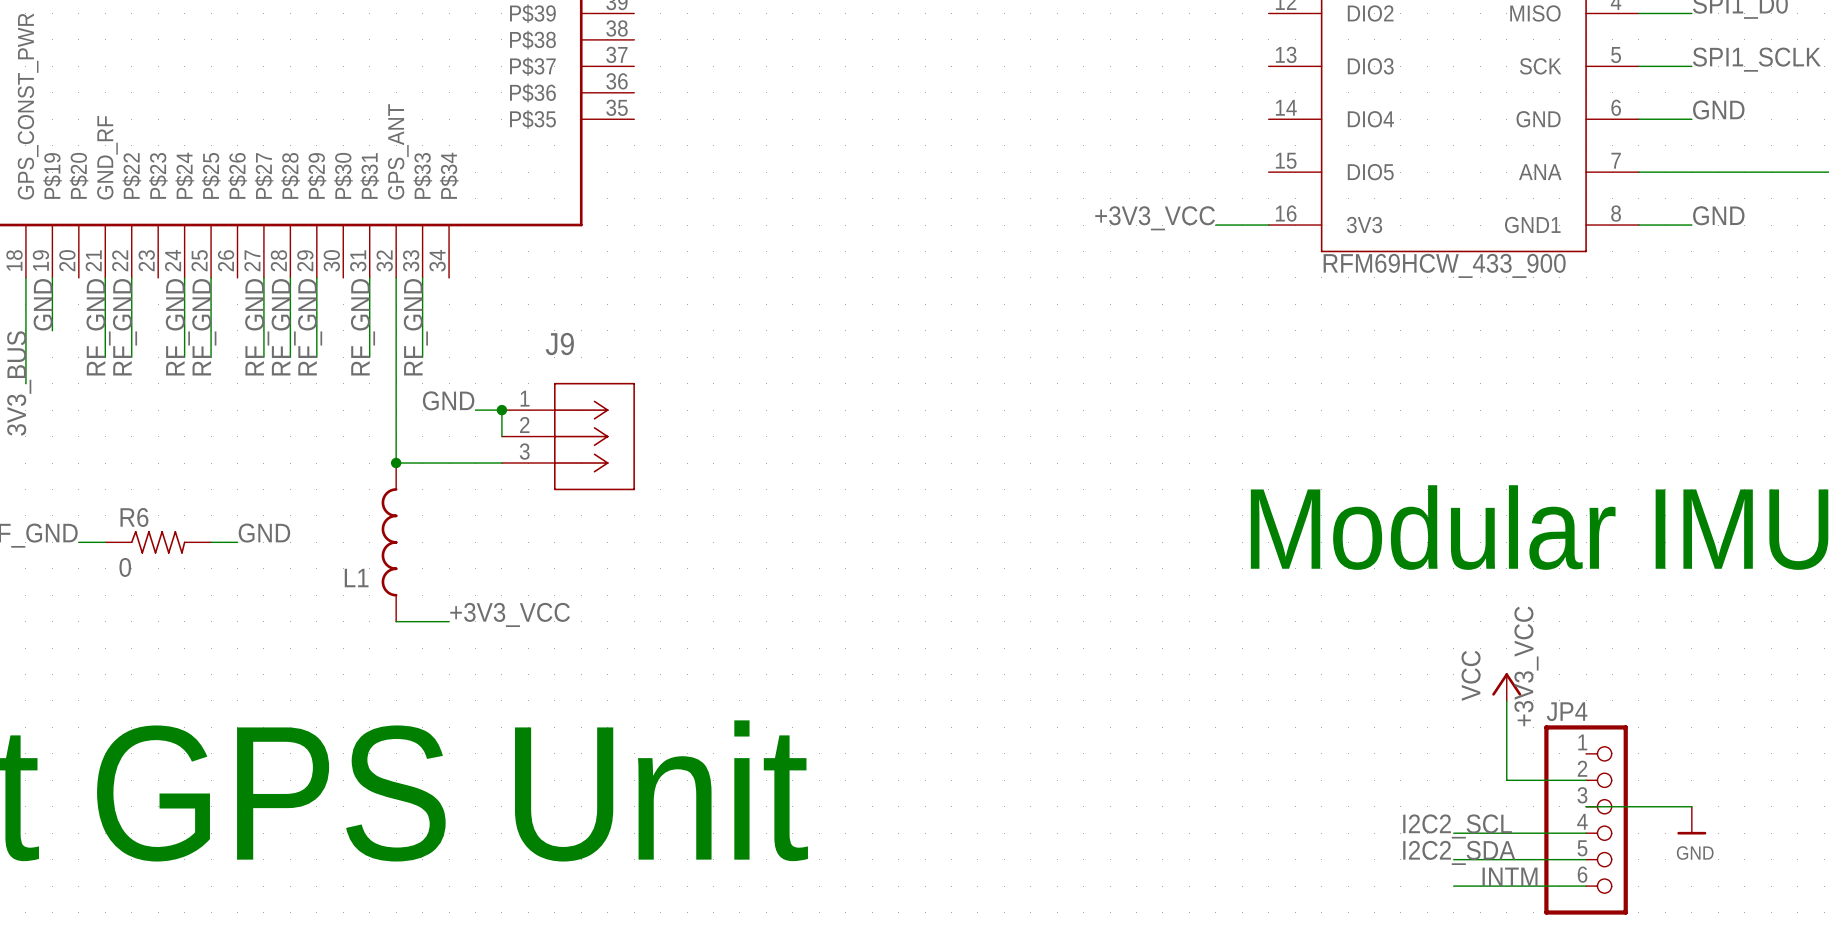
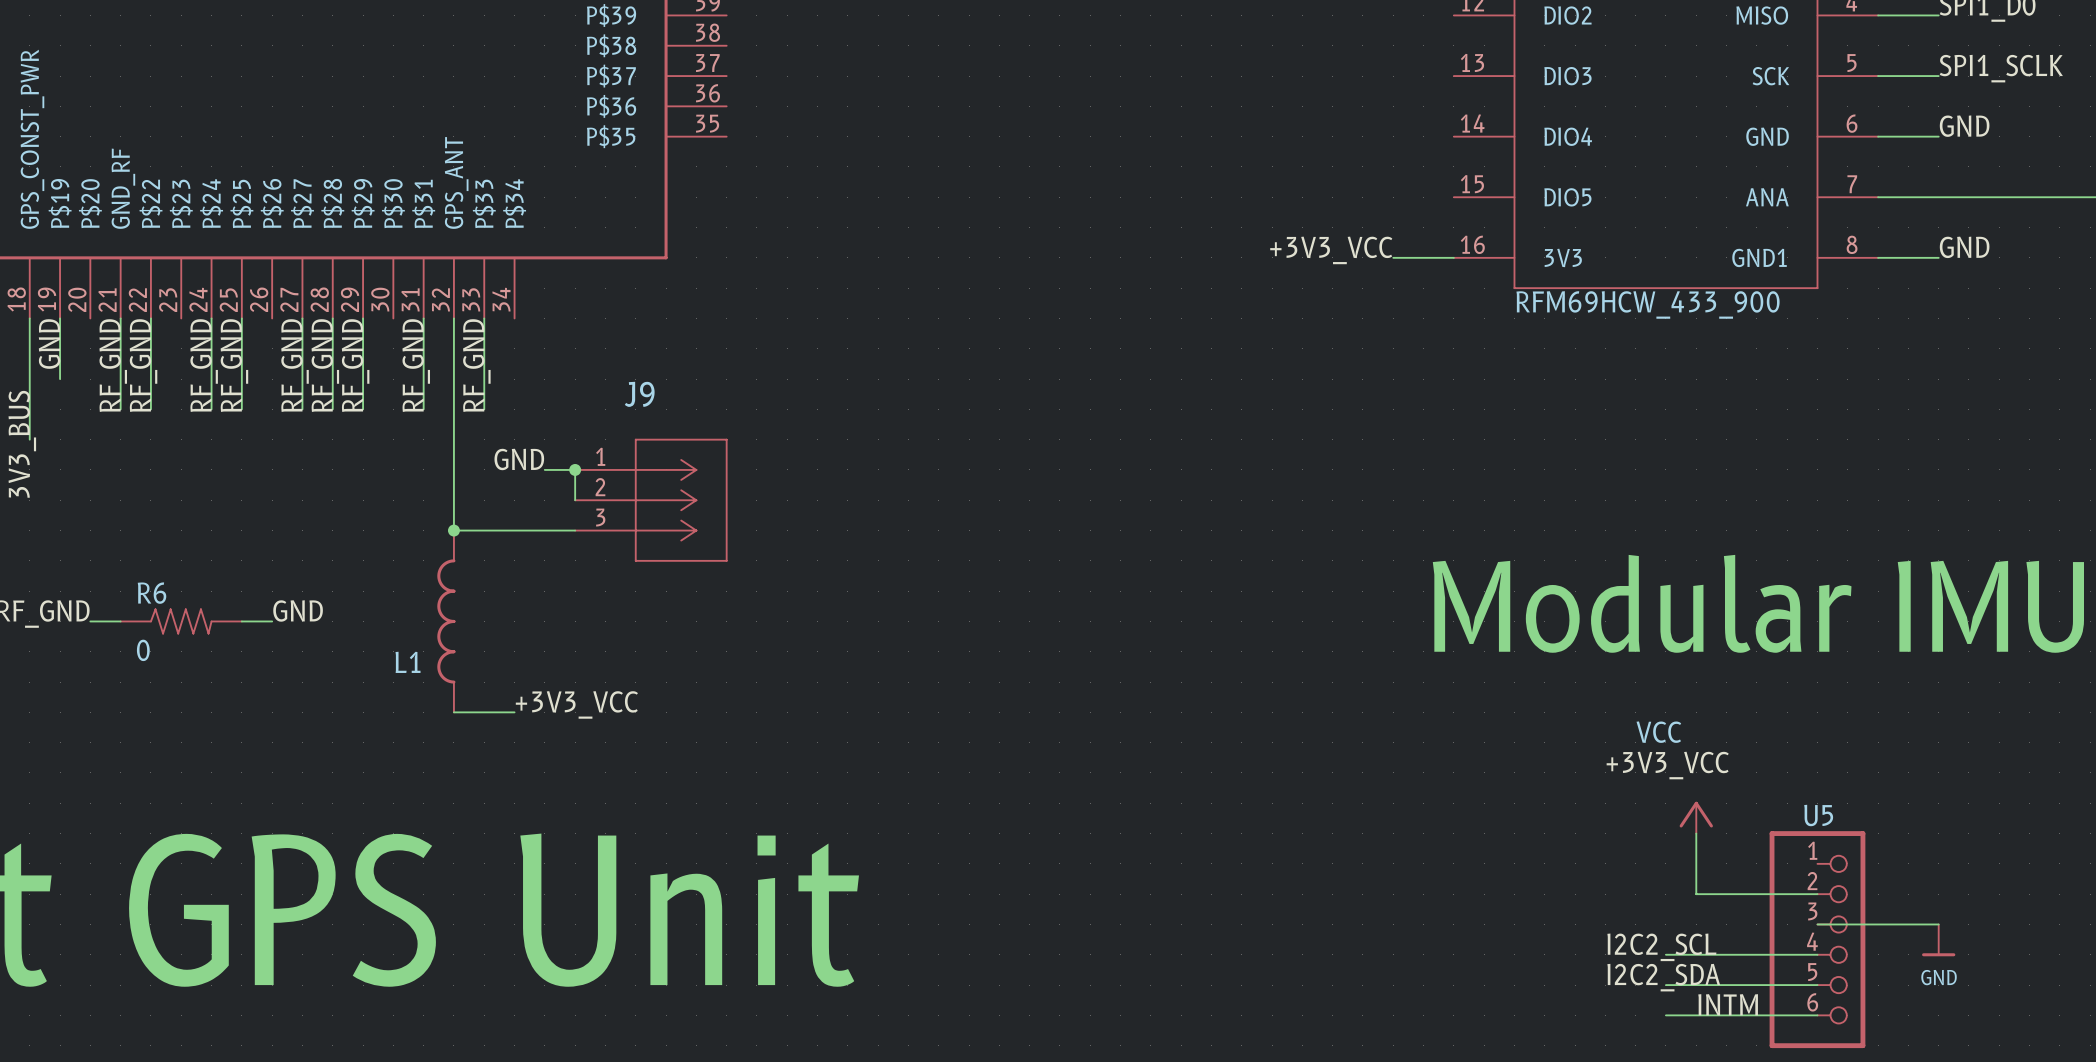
label rotation: 0° (1526, 666) -> 90° clockwise (1667, 765)
power symbol text rotation: 0° (1471, 675) -> 90° clockwise (1658, 732)
power symbol position: VCC (1506, 687) -> VCC (1696, 817)
wire: (1506, 700) (1506, 780) -> (1696, 833) (1696, 894) (1726, 894)
JP4 name: JP4 (1567, 711) -> U5 (1818, 815)

